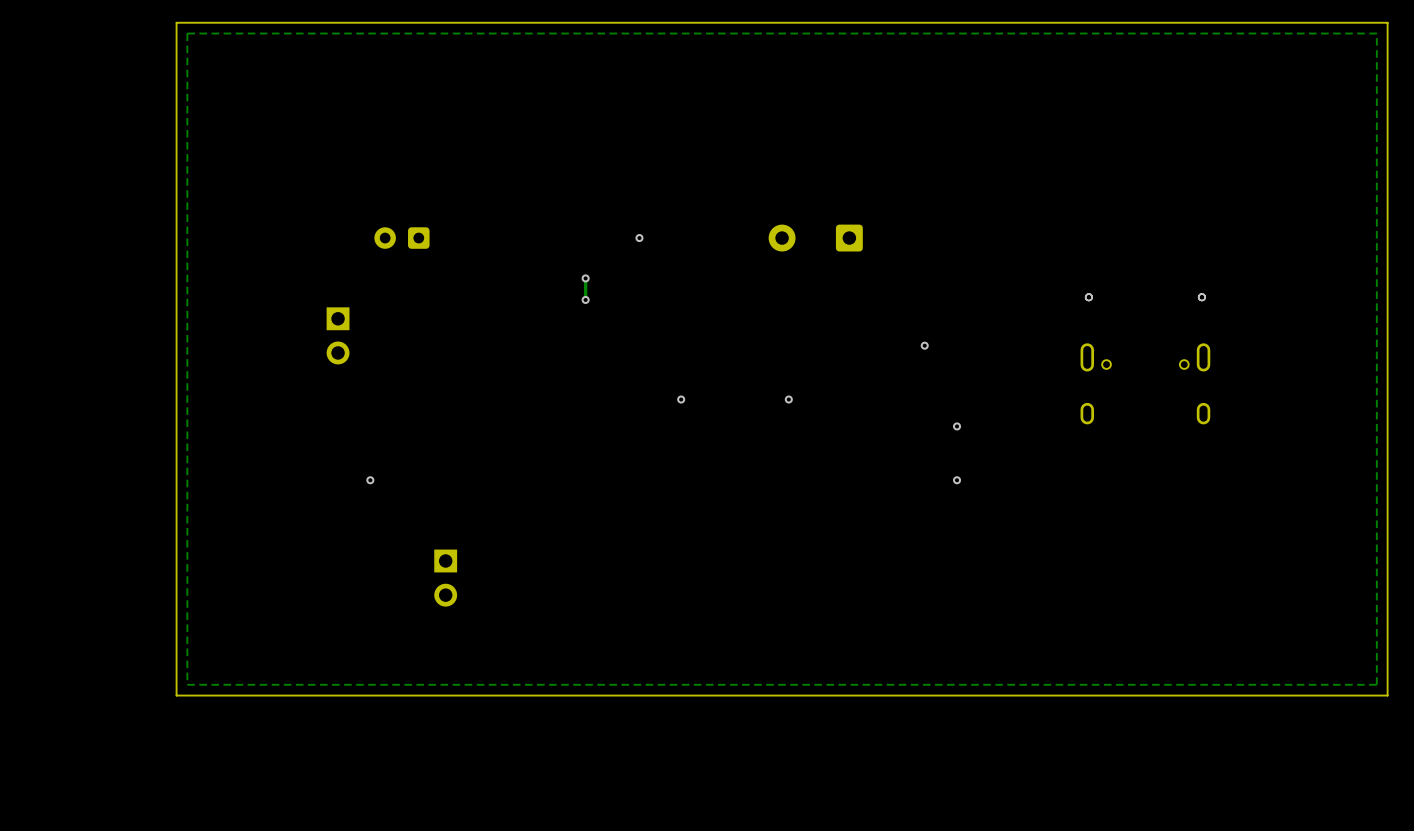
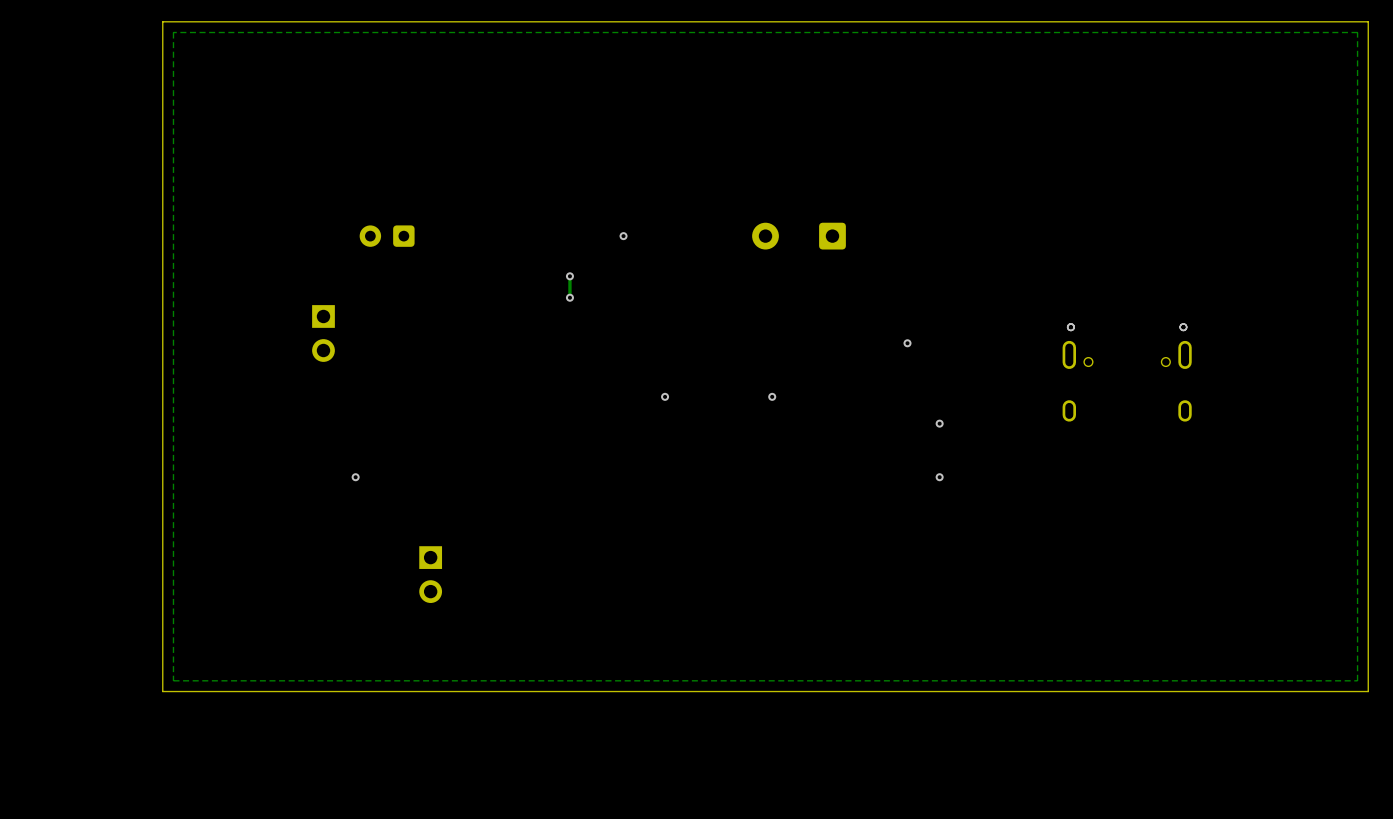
via position: (1088, 297) -> (1070, 327)
via position: (1201, 297) -> (1183, 327)

